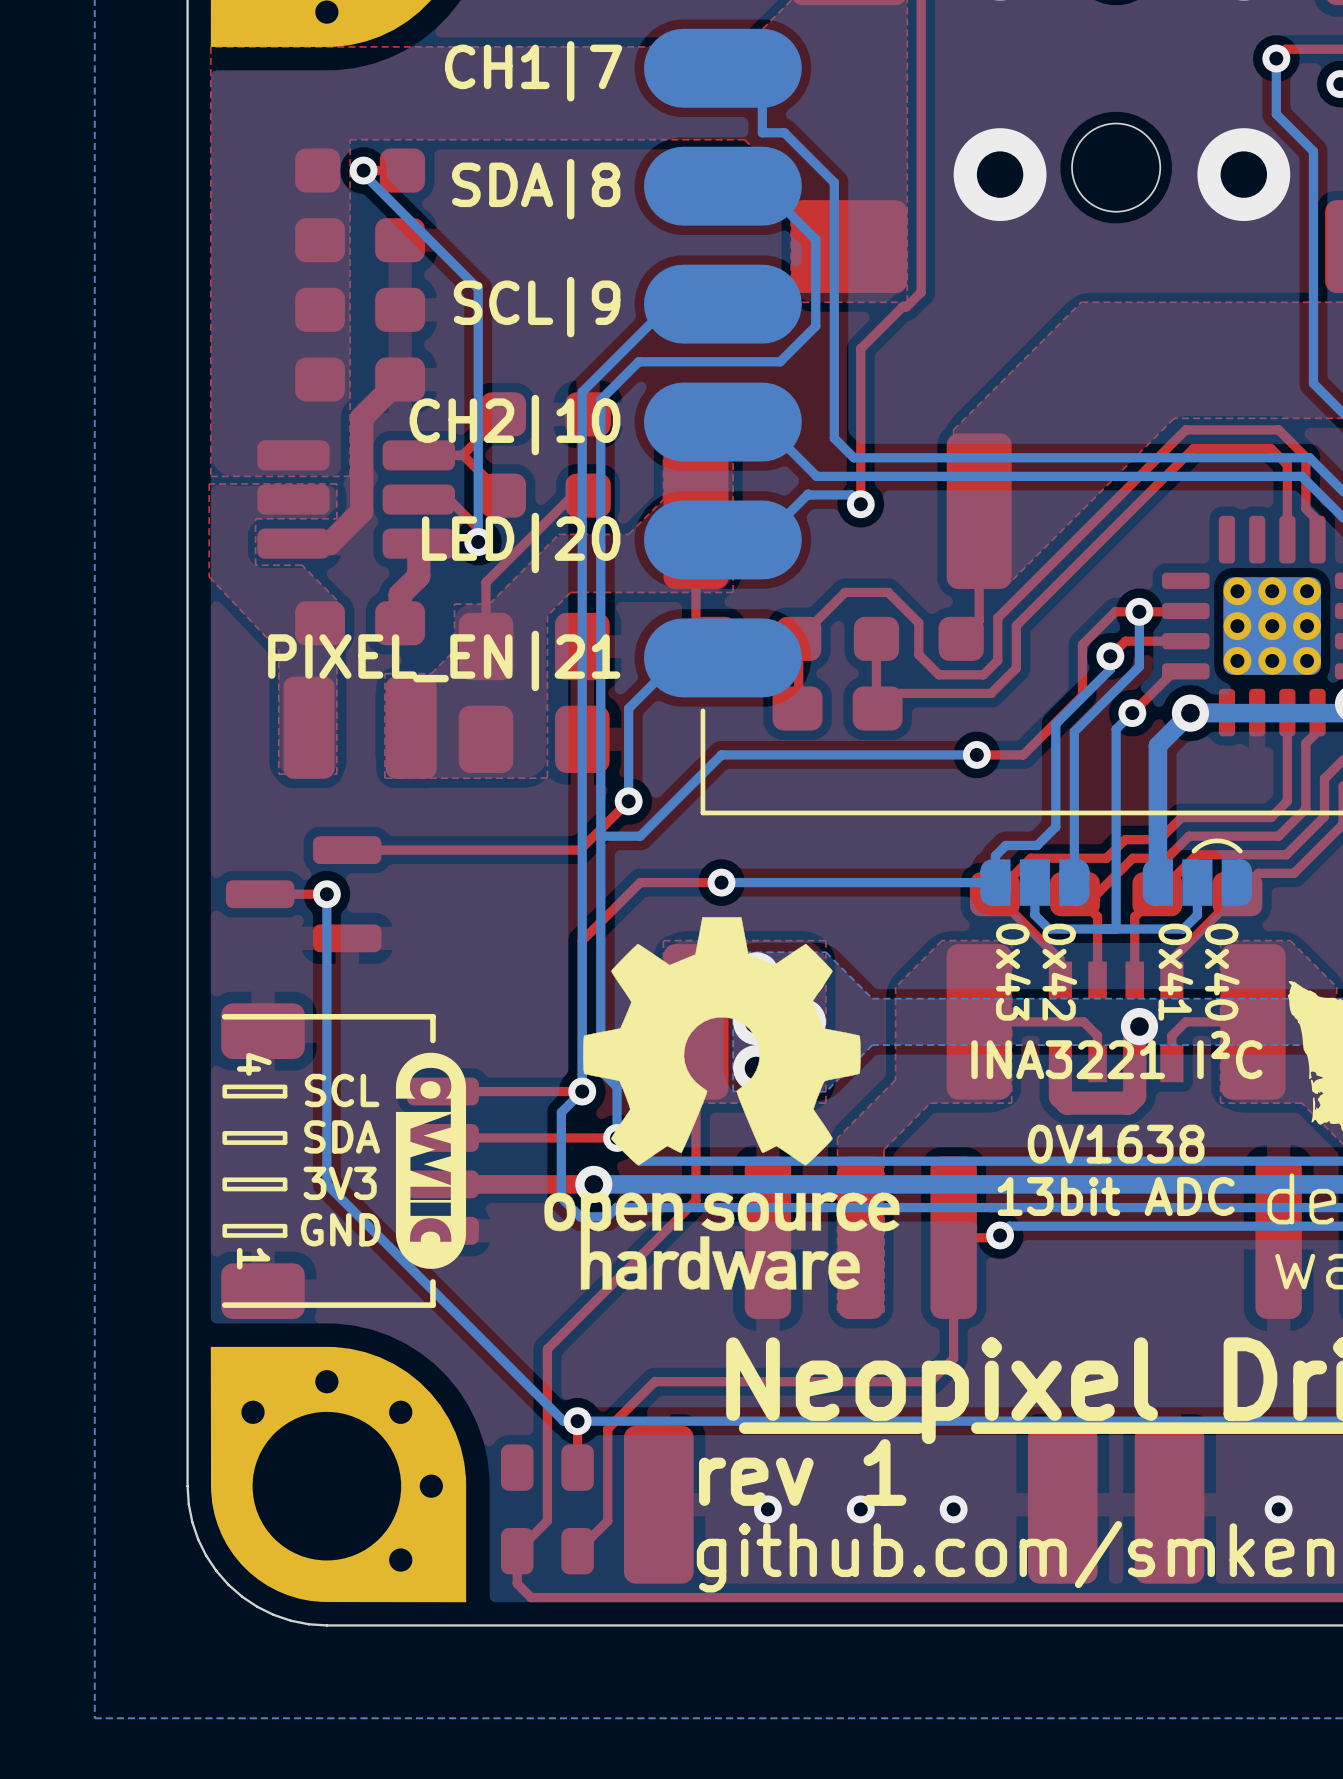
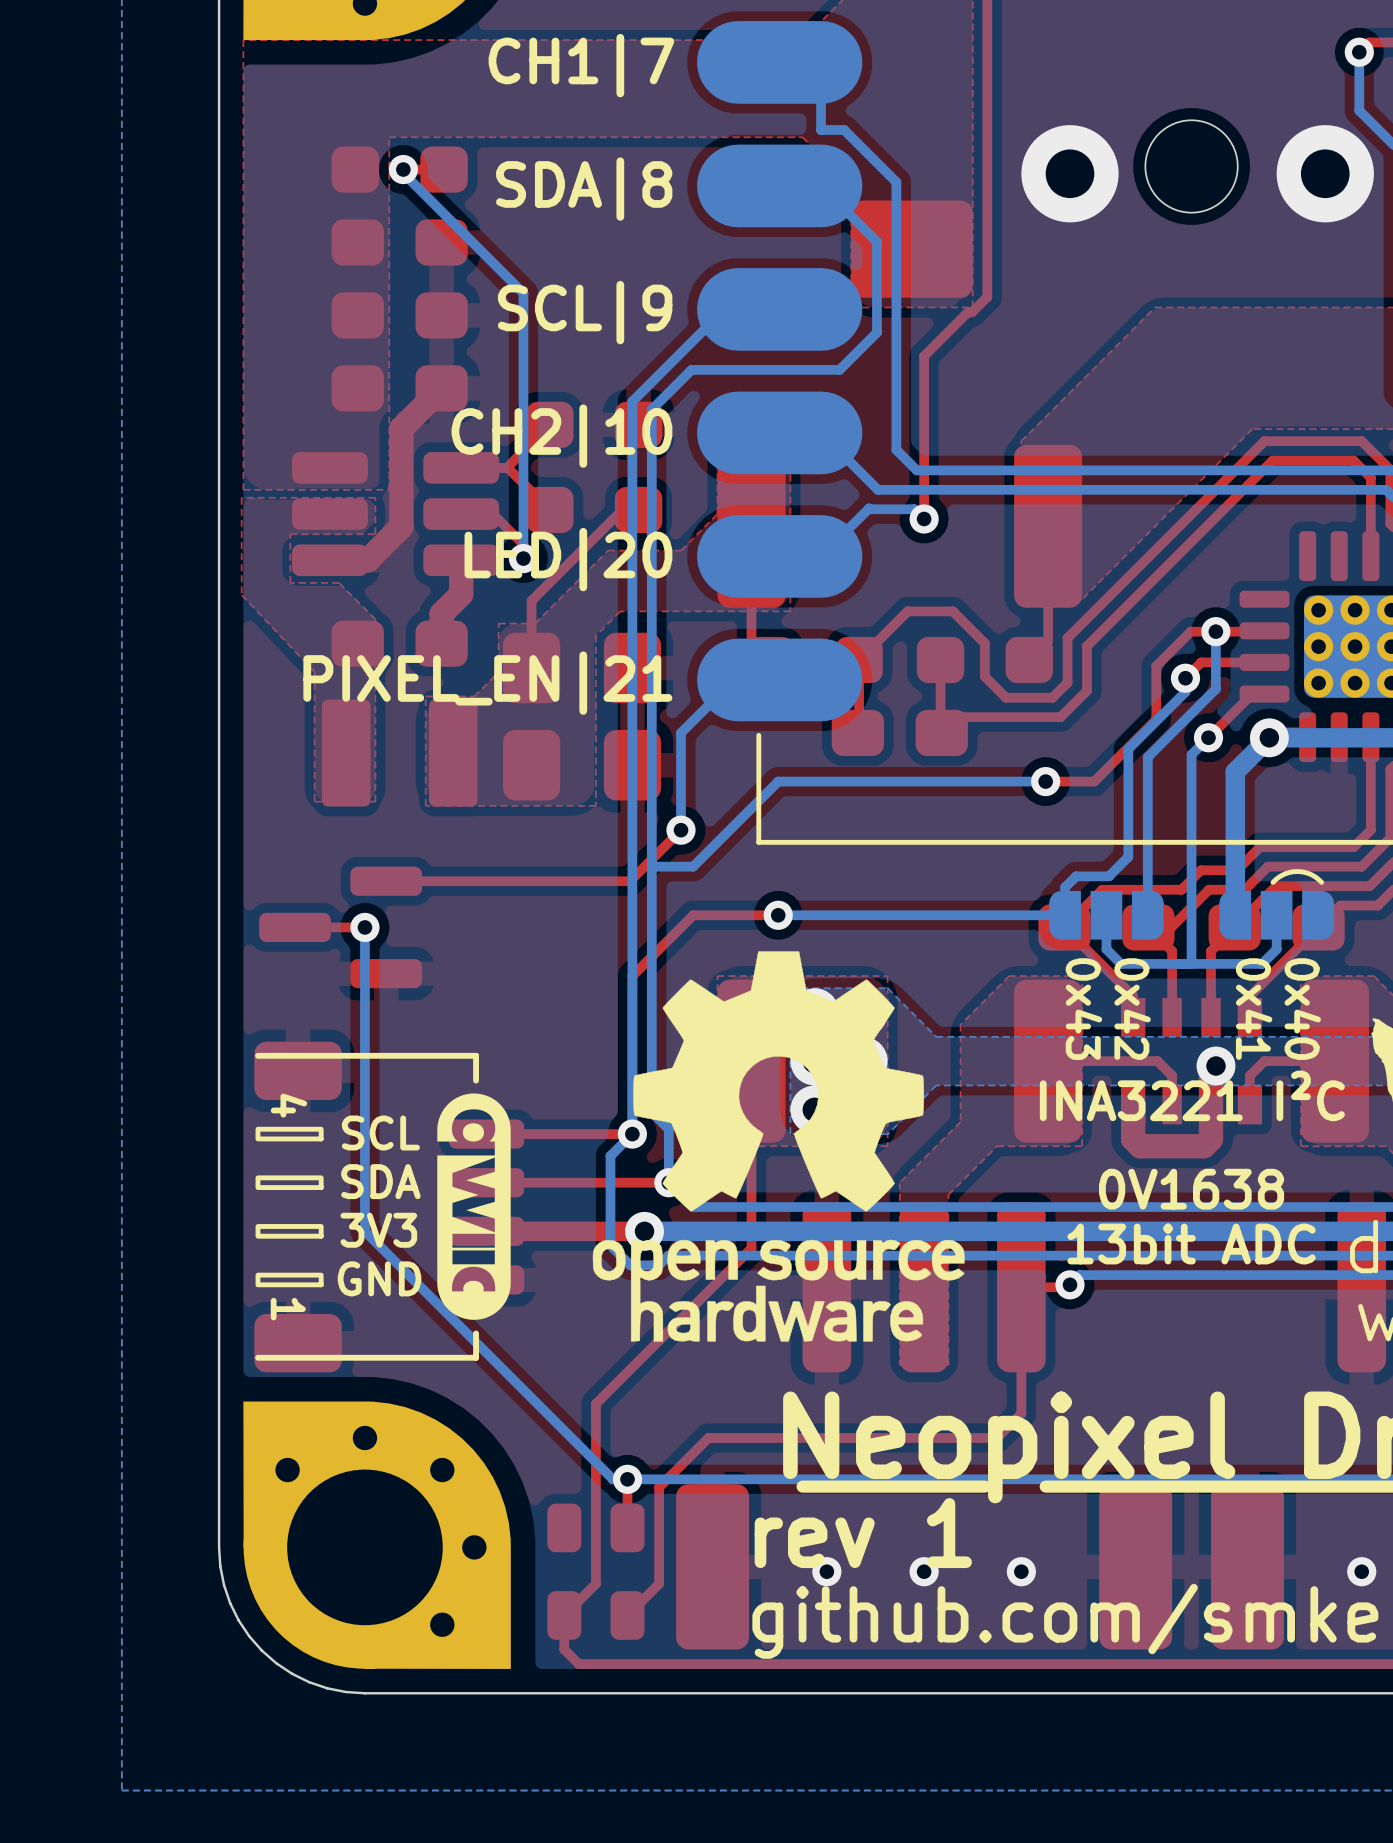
part footprint: [283, 676, 437, 779] -> [321, 699, 478, 807]

